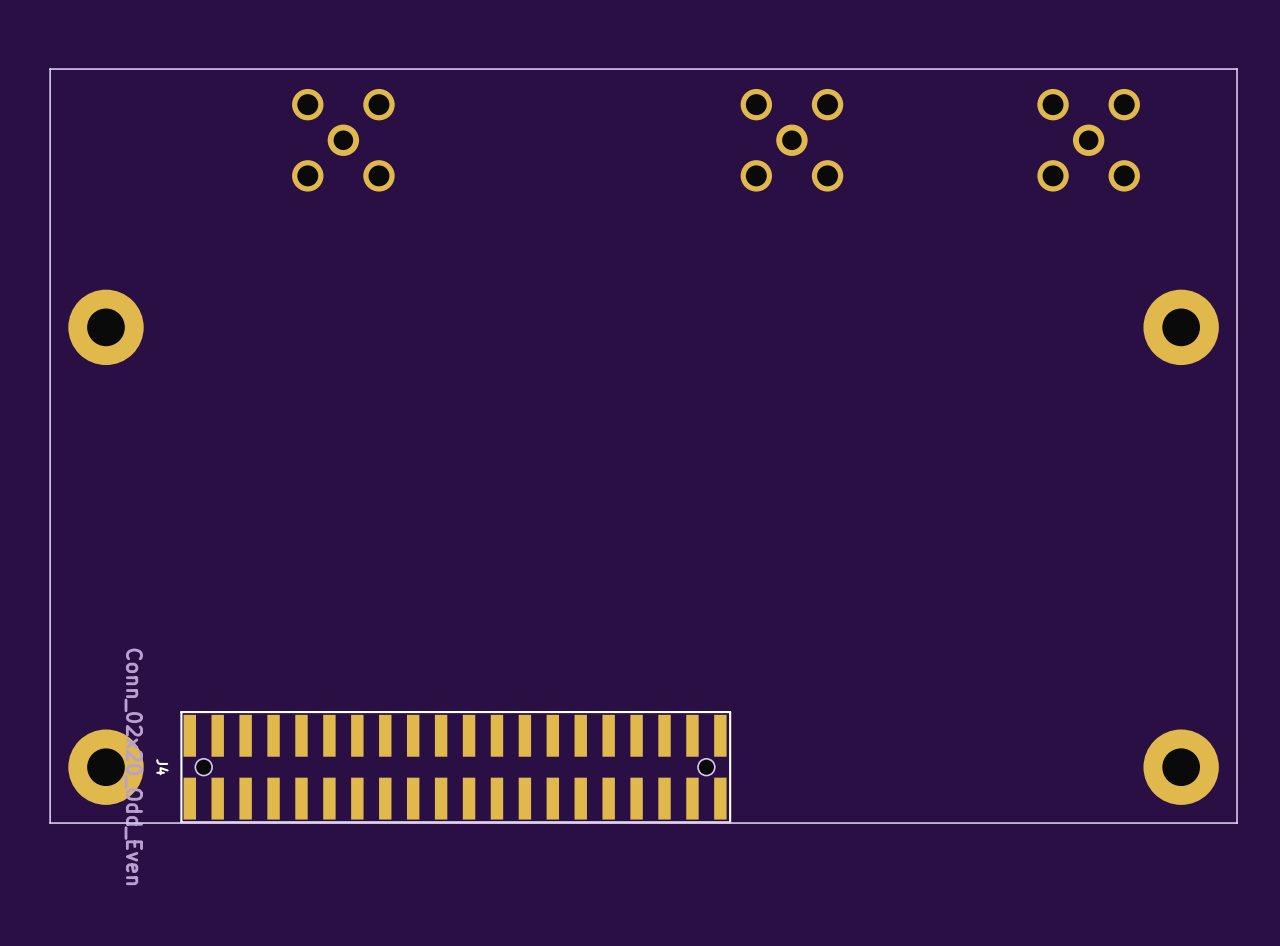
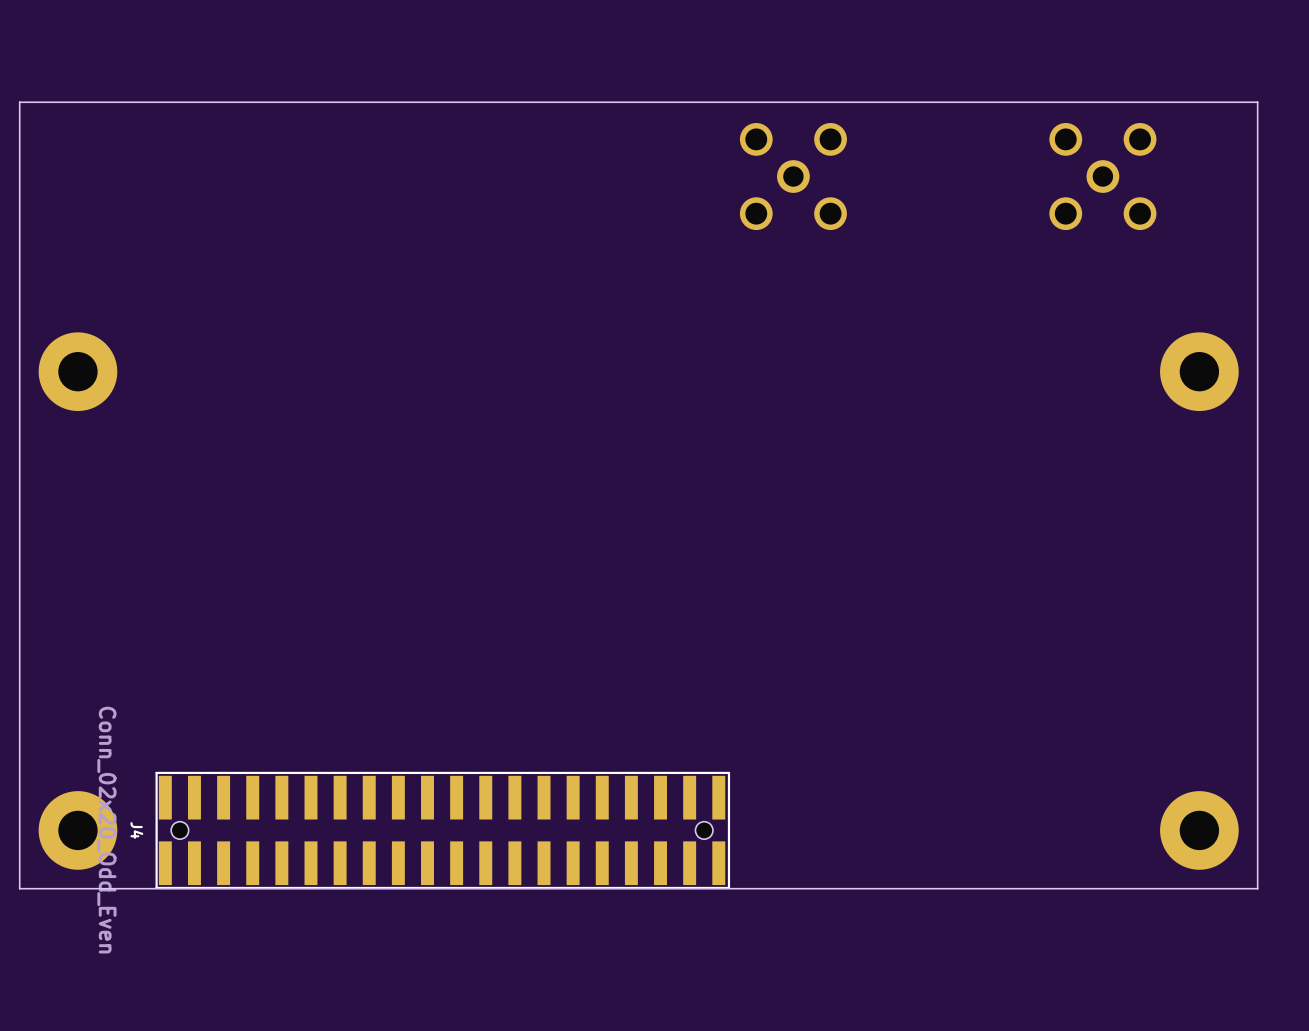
part: (343, 140) -> none

